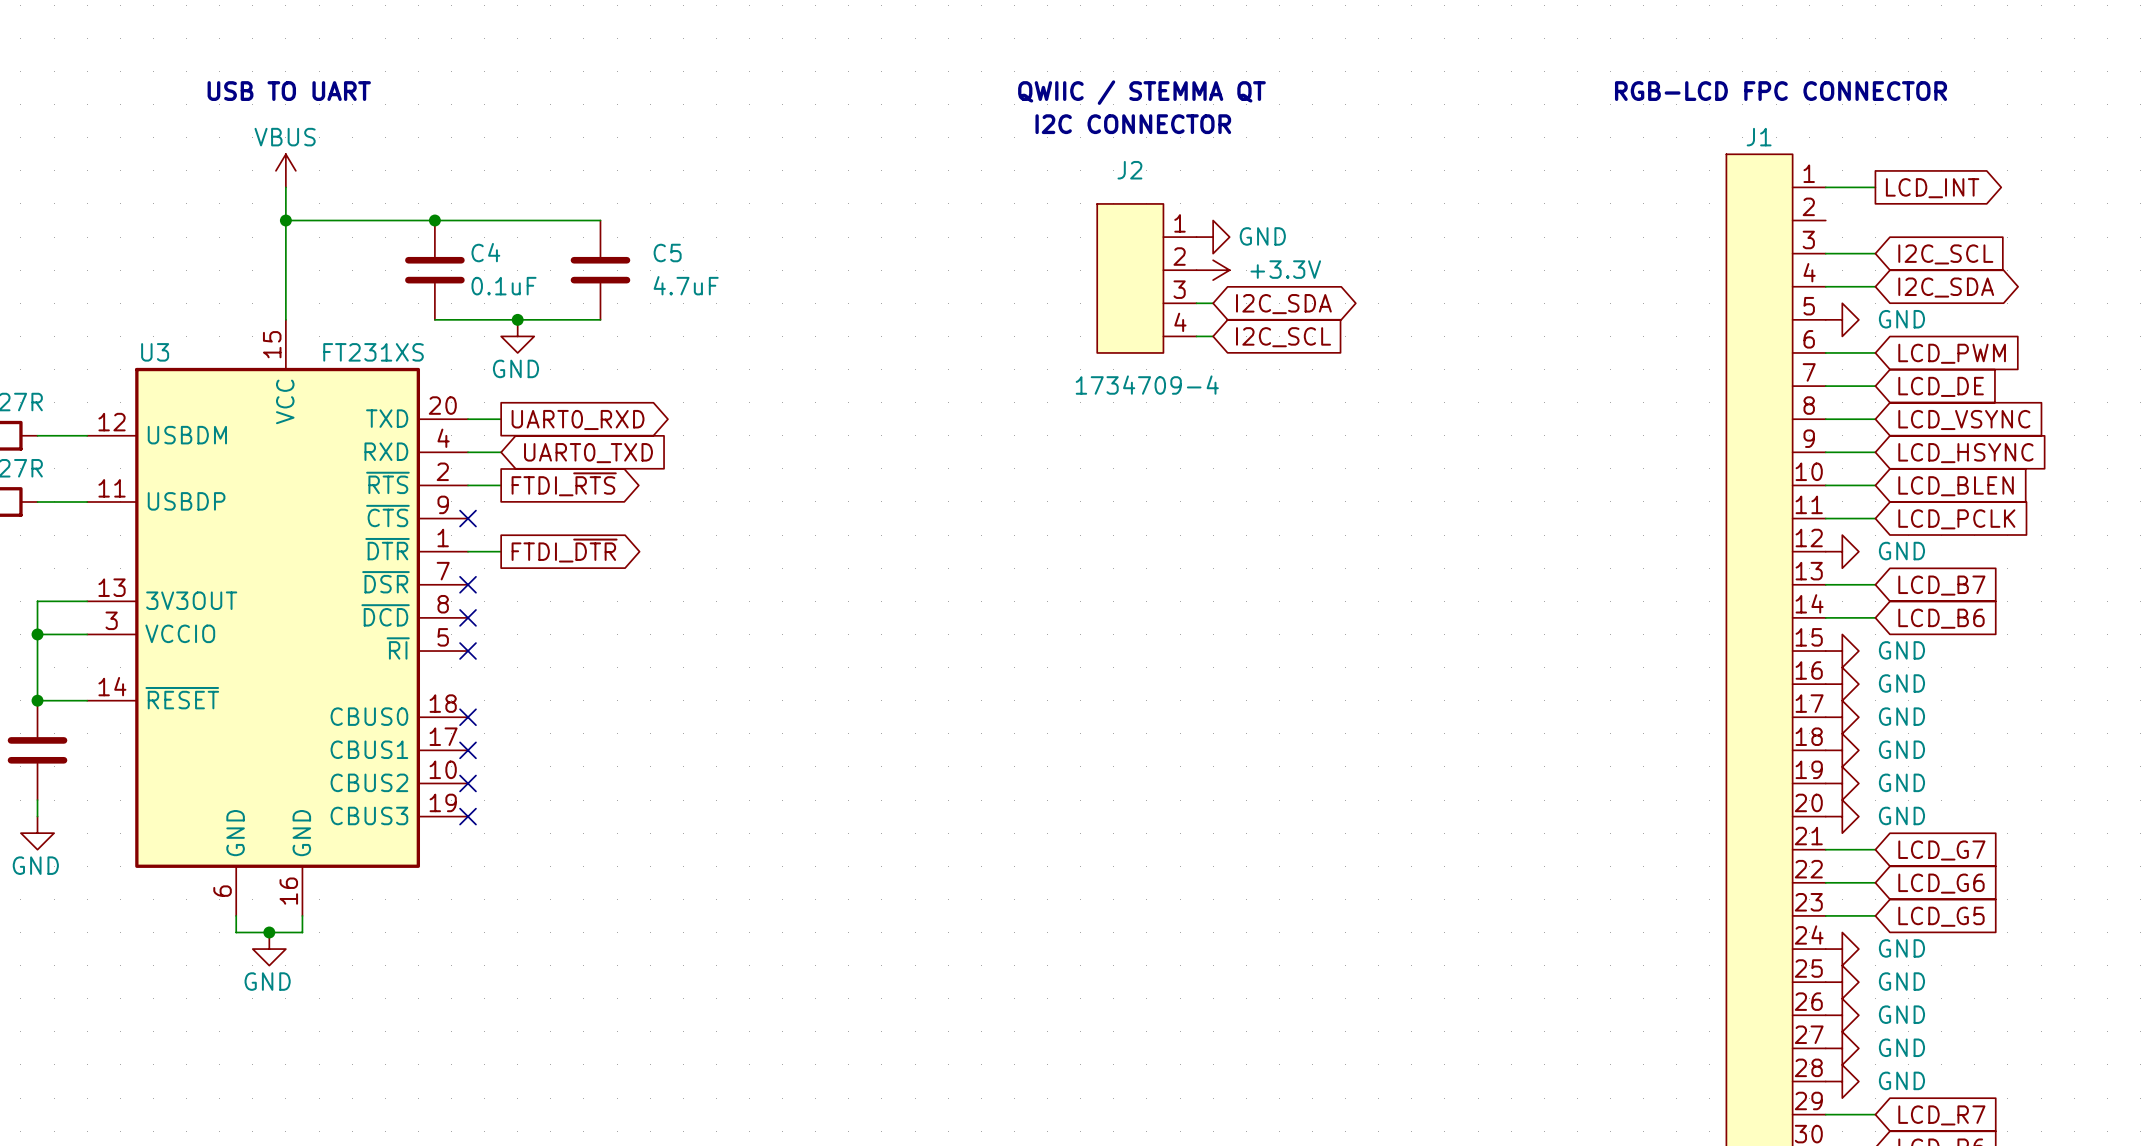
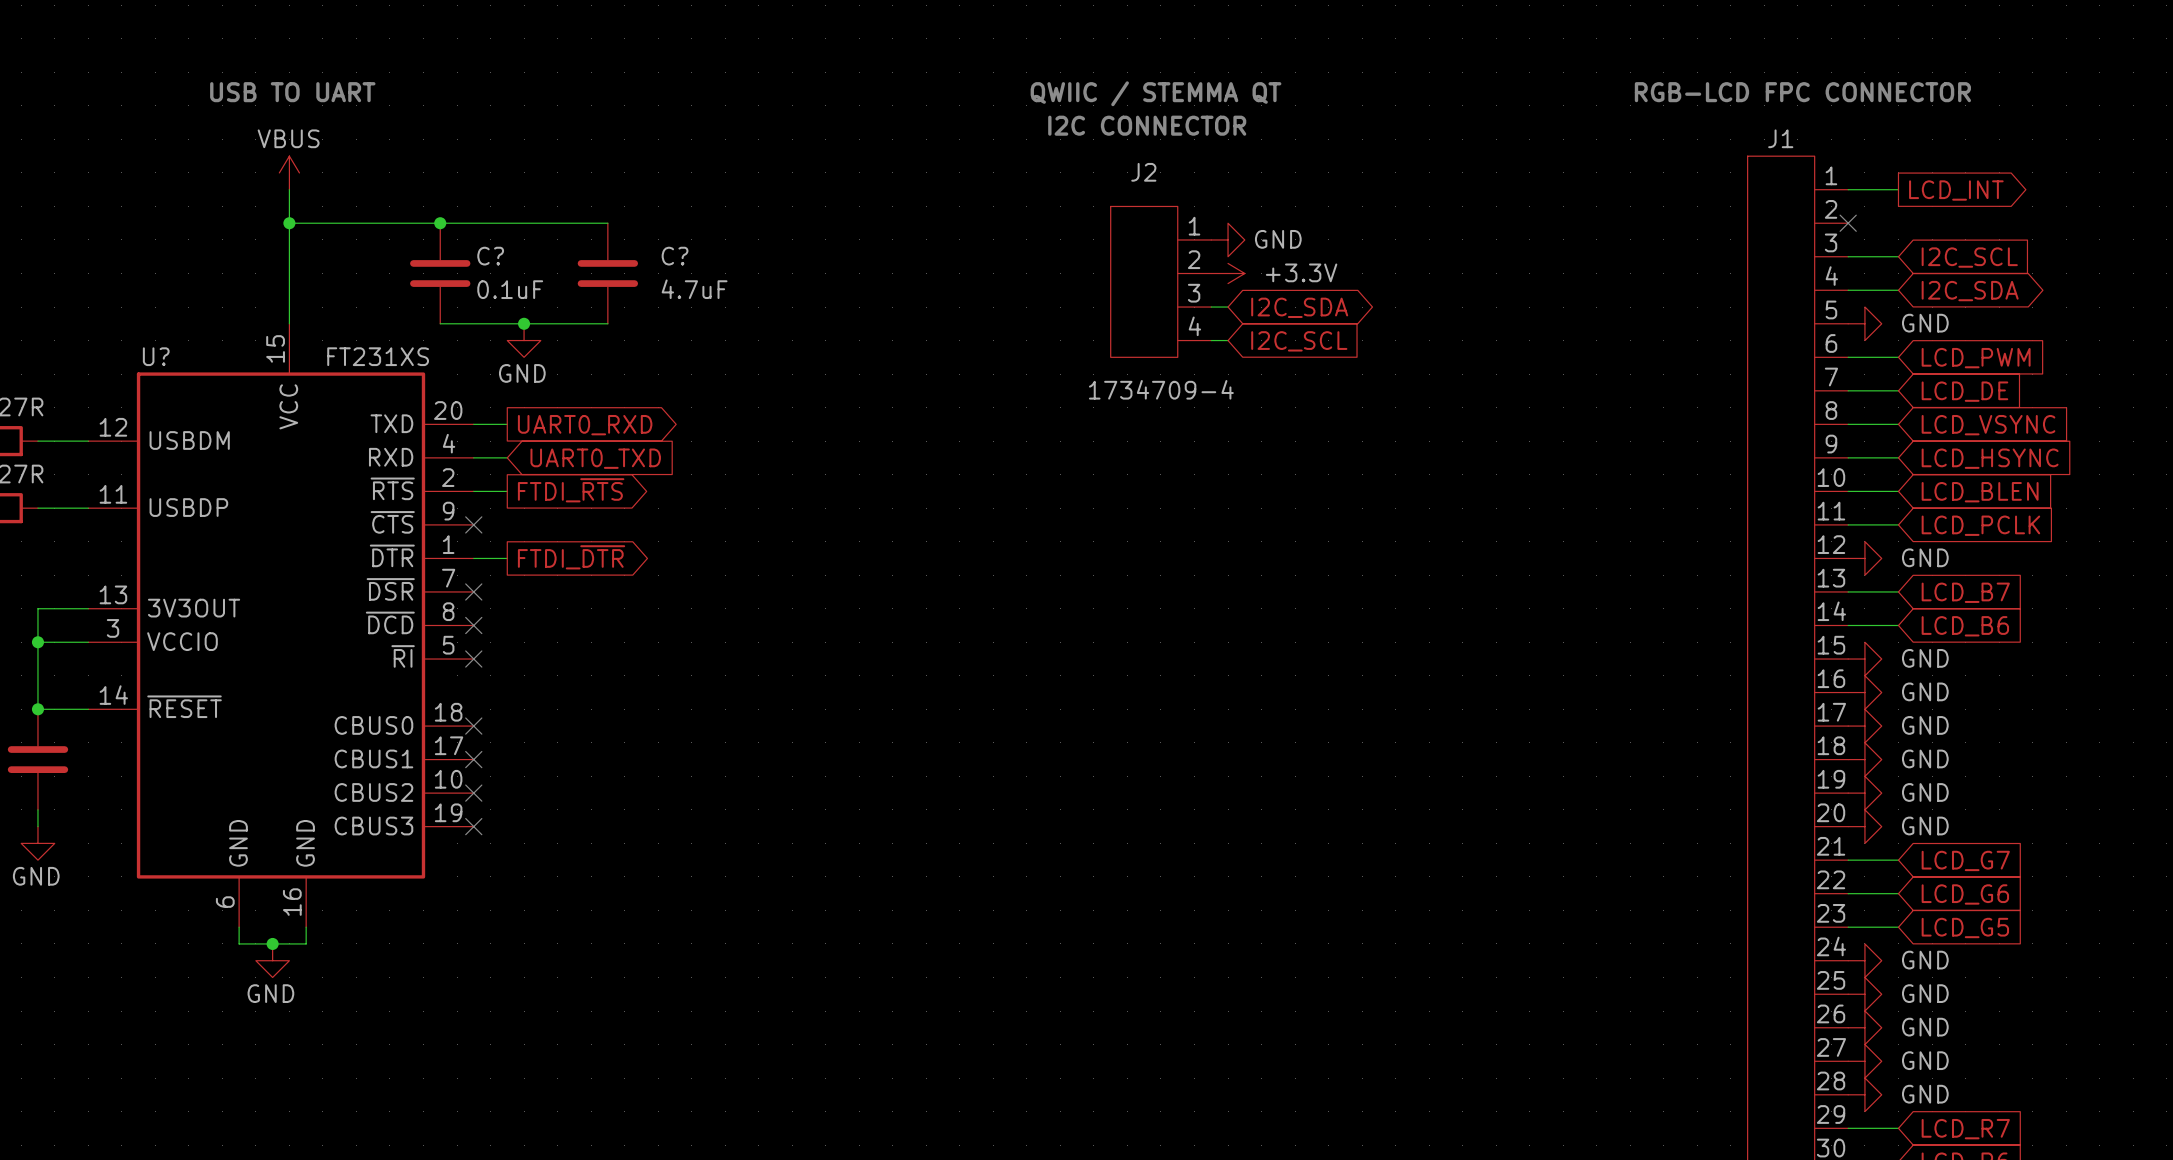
no-connect mark: none -> (1848, 223)
C4 name: C4 (485, 252) -> C? (490, 256)
C5 name: C5 (667, 253) -> C? (675, 256)
U3 name: U3 (155, 352) -> U? (156, 356)

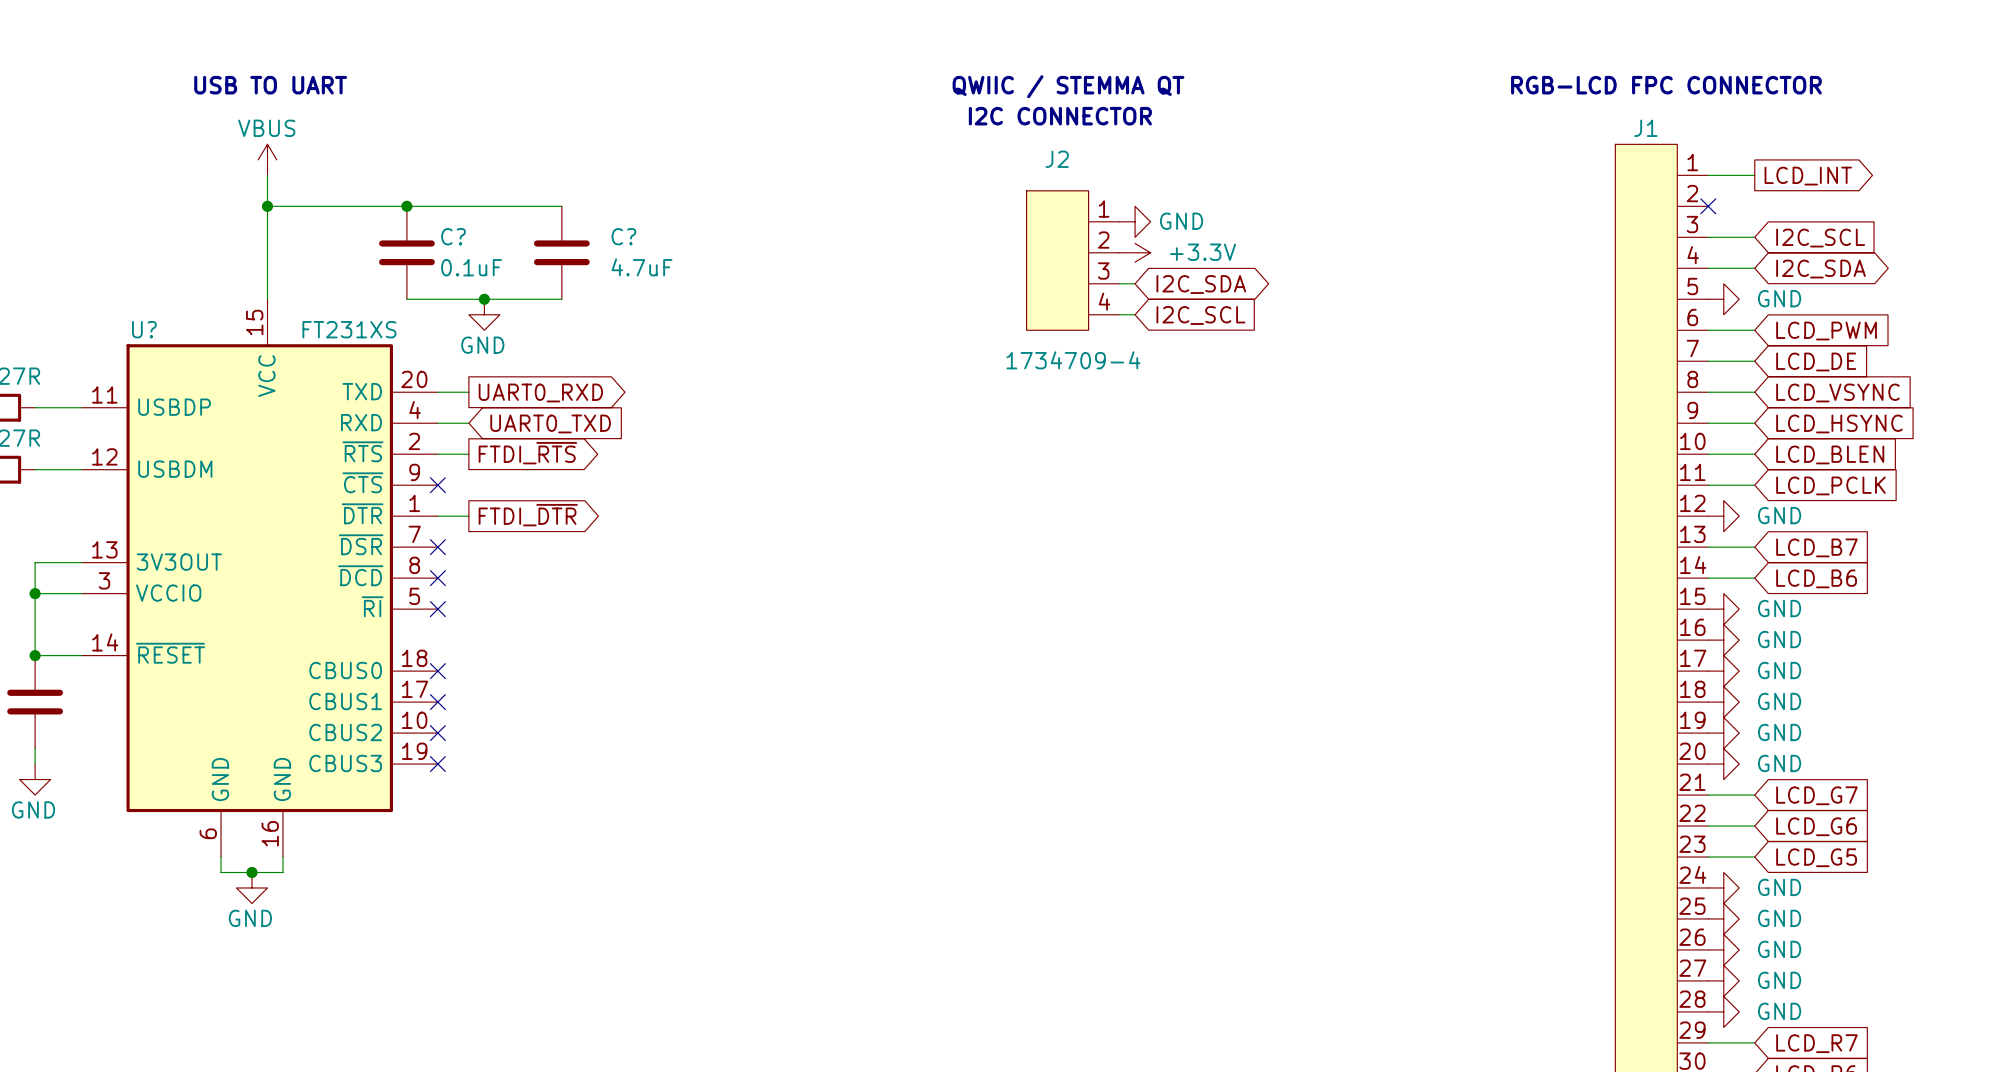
U? pin number: 12 (113, 427) -> 11 (104, 394)
U? pin name: USBDM (189, 440) -> USBDP (174, 407)
U? pin number: 11 (113, 494) -> 12 (104, 456)
U? pin name: USBDP (188, 507) -> USBDM (175, 469)

